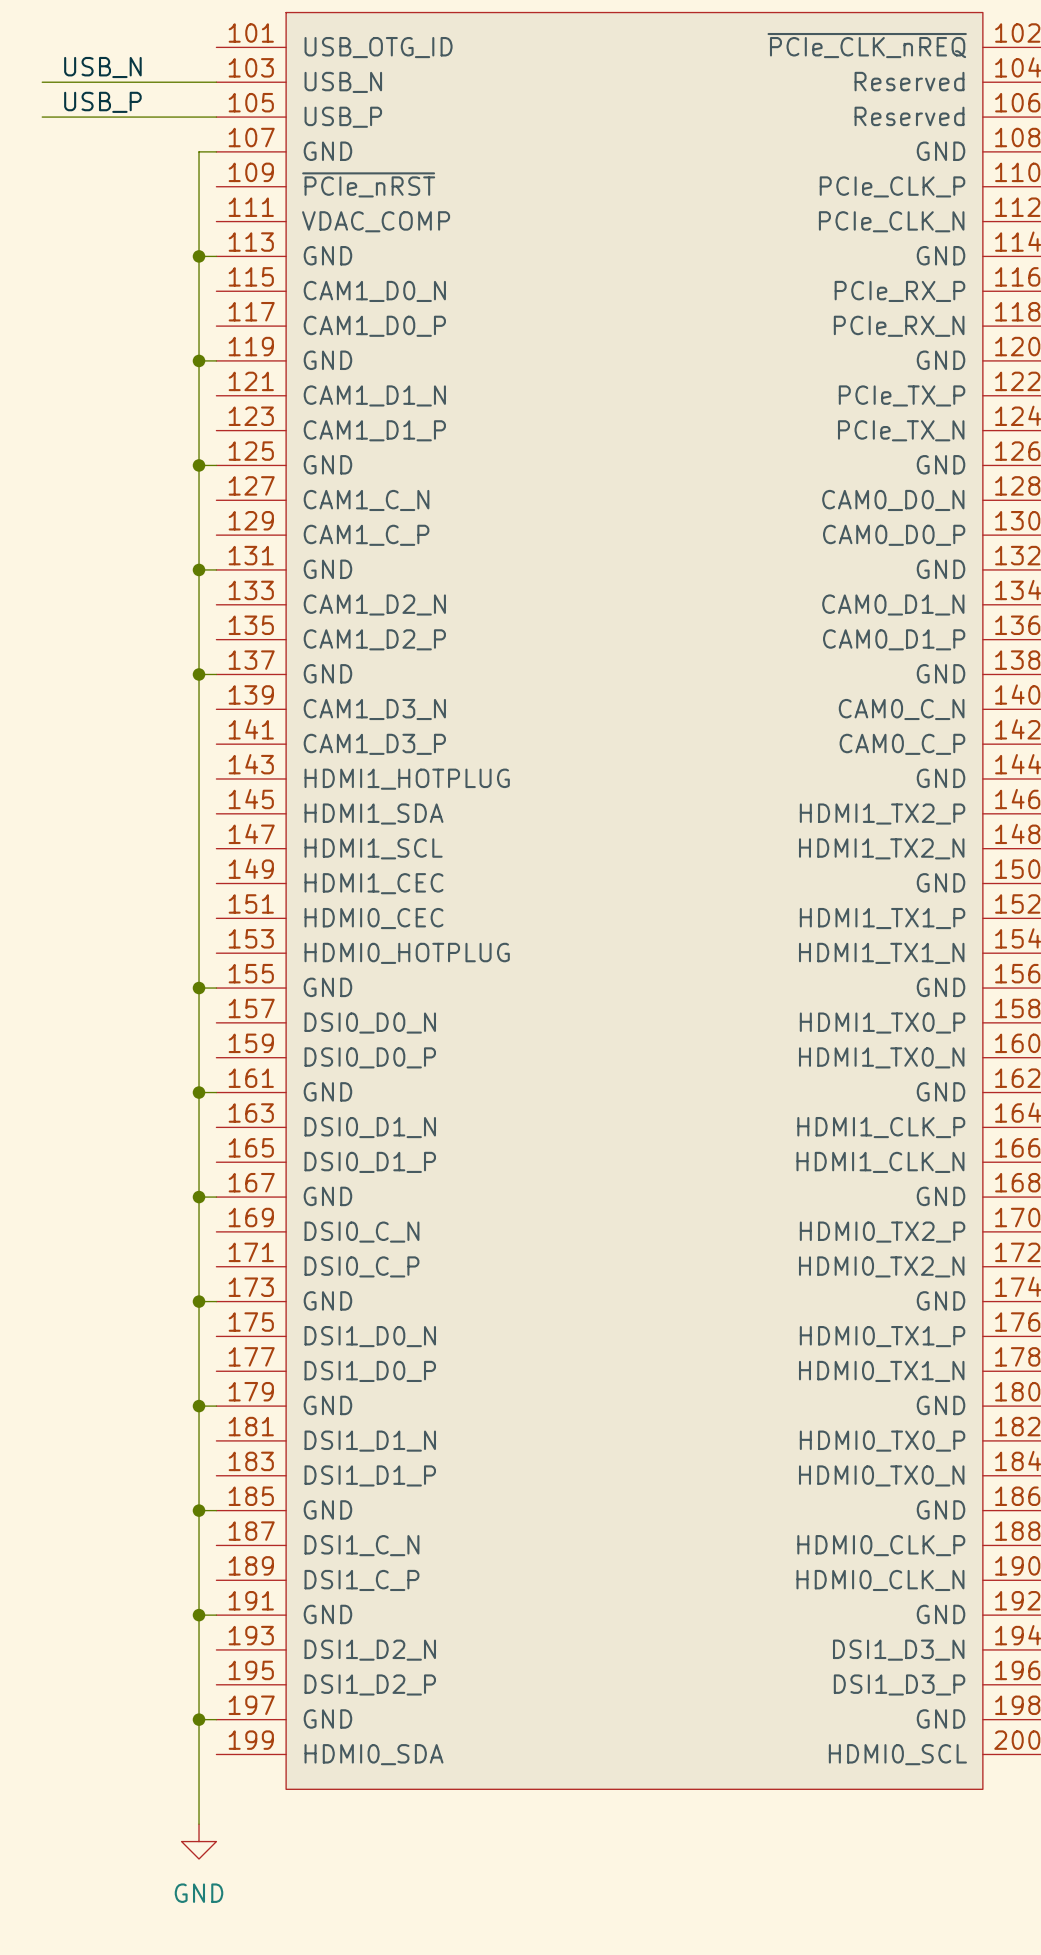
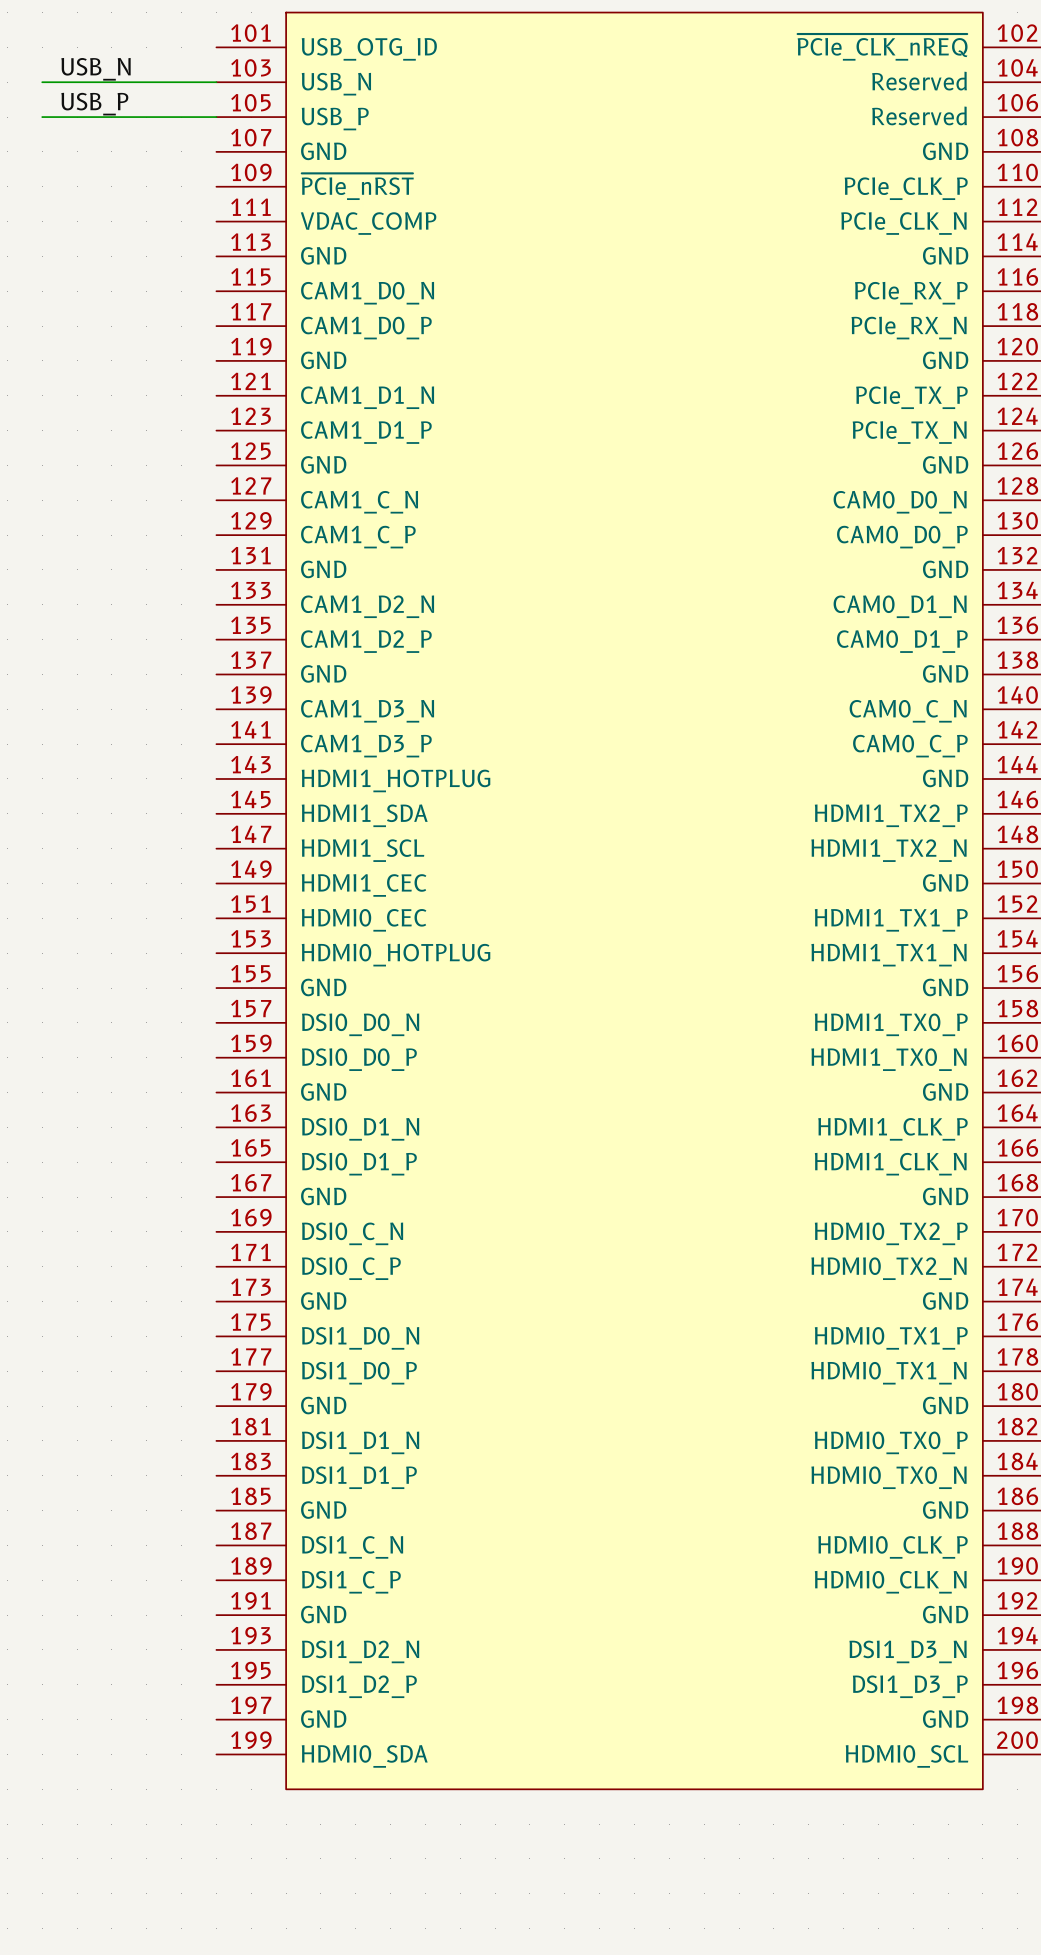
wire: (216, 151) (199, 151) (199, 1824) -> none
wire: (199, 256) (216, 256) -> none
junction: (199, 256) -> none
wire: (199, 360) (216, 360) -> none
junction: (199, 360) -> none
wire: (199, 465) (216, 465) -> none
junction: (199, 465) -> none
wire: (199, 569) (216, 569) -> none
junction: (199, 569) -> none
wire: (199, 674) (216, 674) -> none
junction: (199, 674) -> none
wire: (199, 988) (216, 988) -> none
junction: (199, 988) -> none
wire: (199, 1092) (216, 1092) -> none
junction: (199, 1092) -> none
wire: (199, 1197) (216, 1197) -> none
junction: (199, 1197) -> none
wire: (199, 1301) (216, 1301) -> none
junction: (199, 1301) -> none
wire: (199, 1406) (216, 1406) -> none
junction: (199, 1406) -> none
wire: (199, 1510) (216, 1510) -> none
junction: (199, 1510) -> none
wire: (199, 1615) (216, 1615) -> none
junction: (199, 1615) -> none
wire: (199, 1719) (216, 1719) -> none
junction: (199, 1719) -> none
power symbol: GND (199, 1841) -> none

